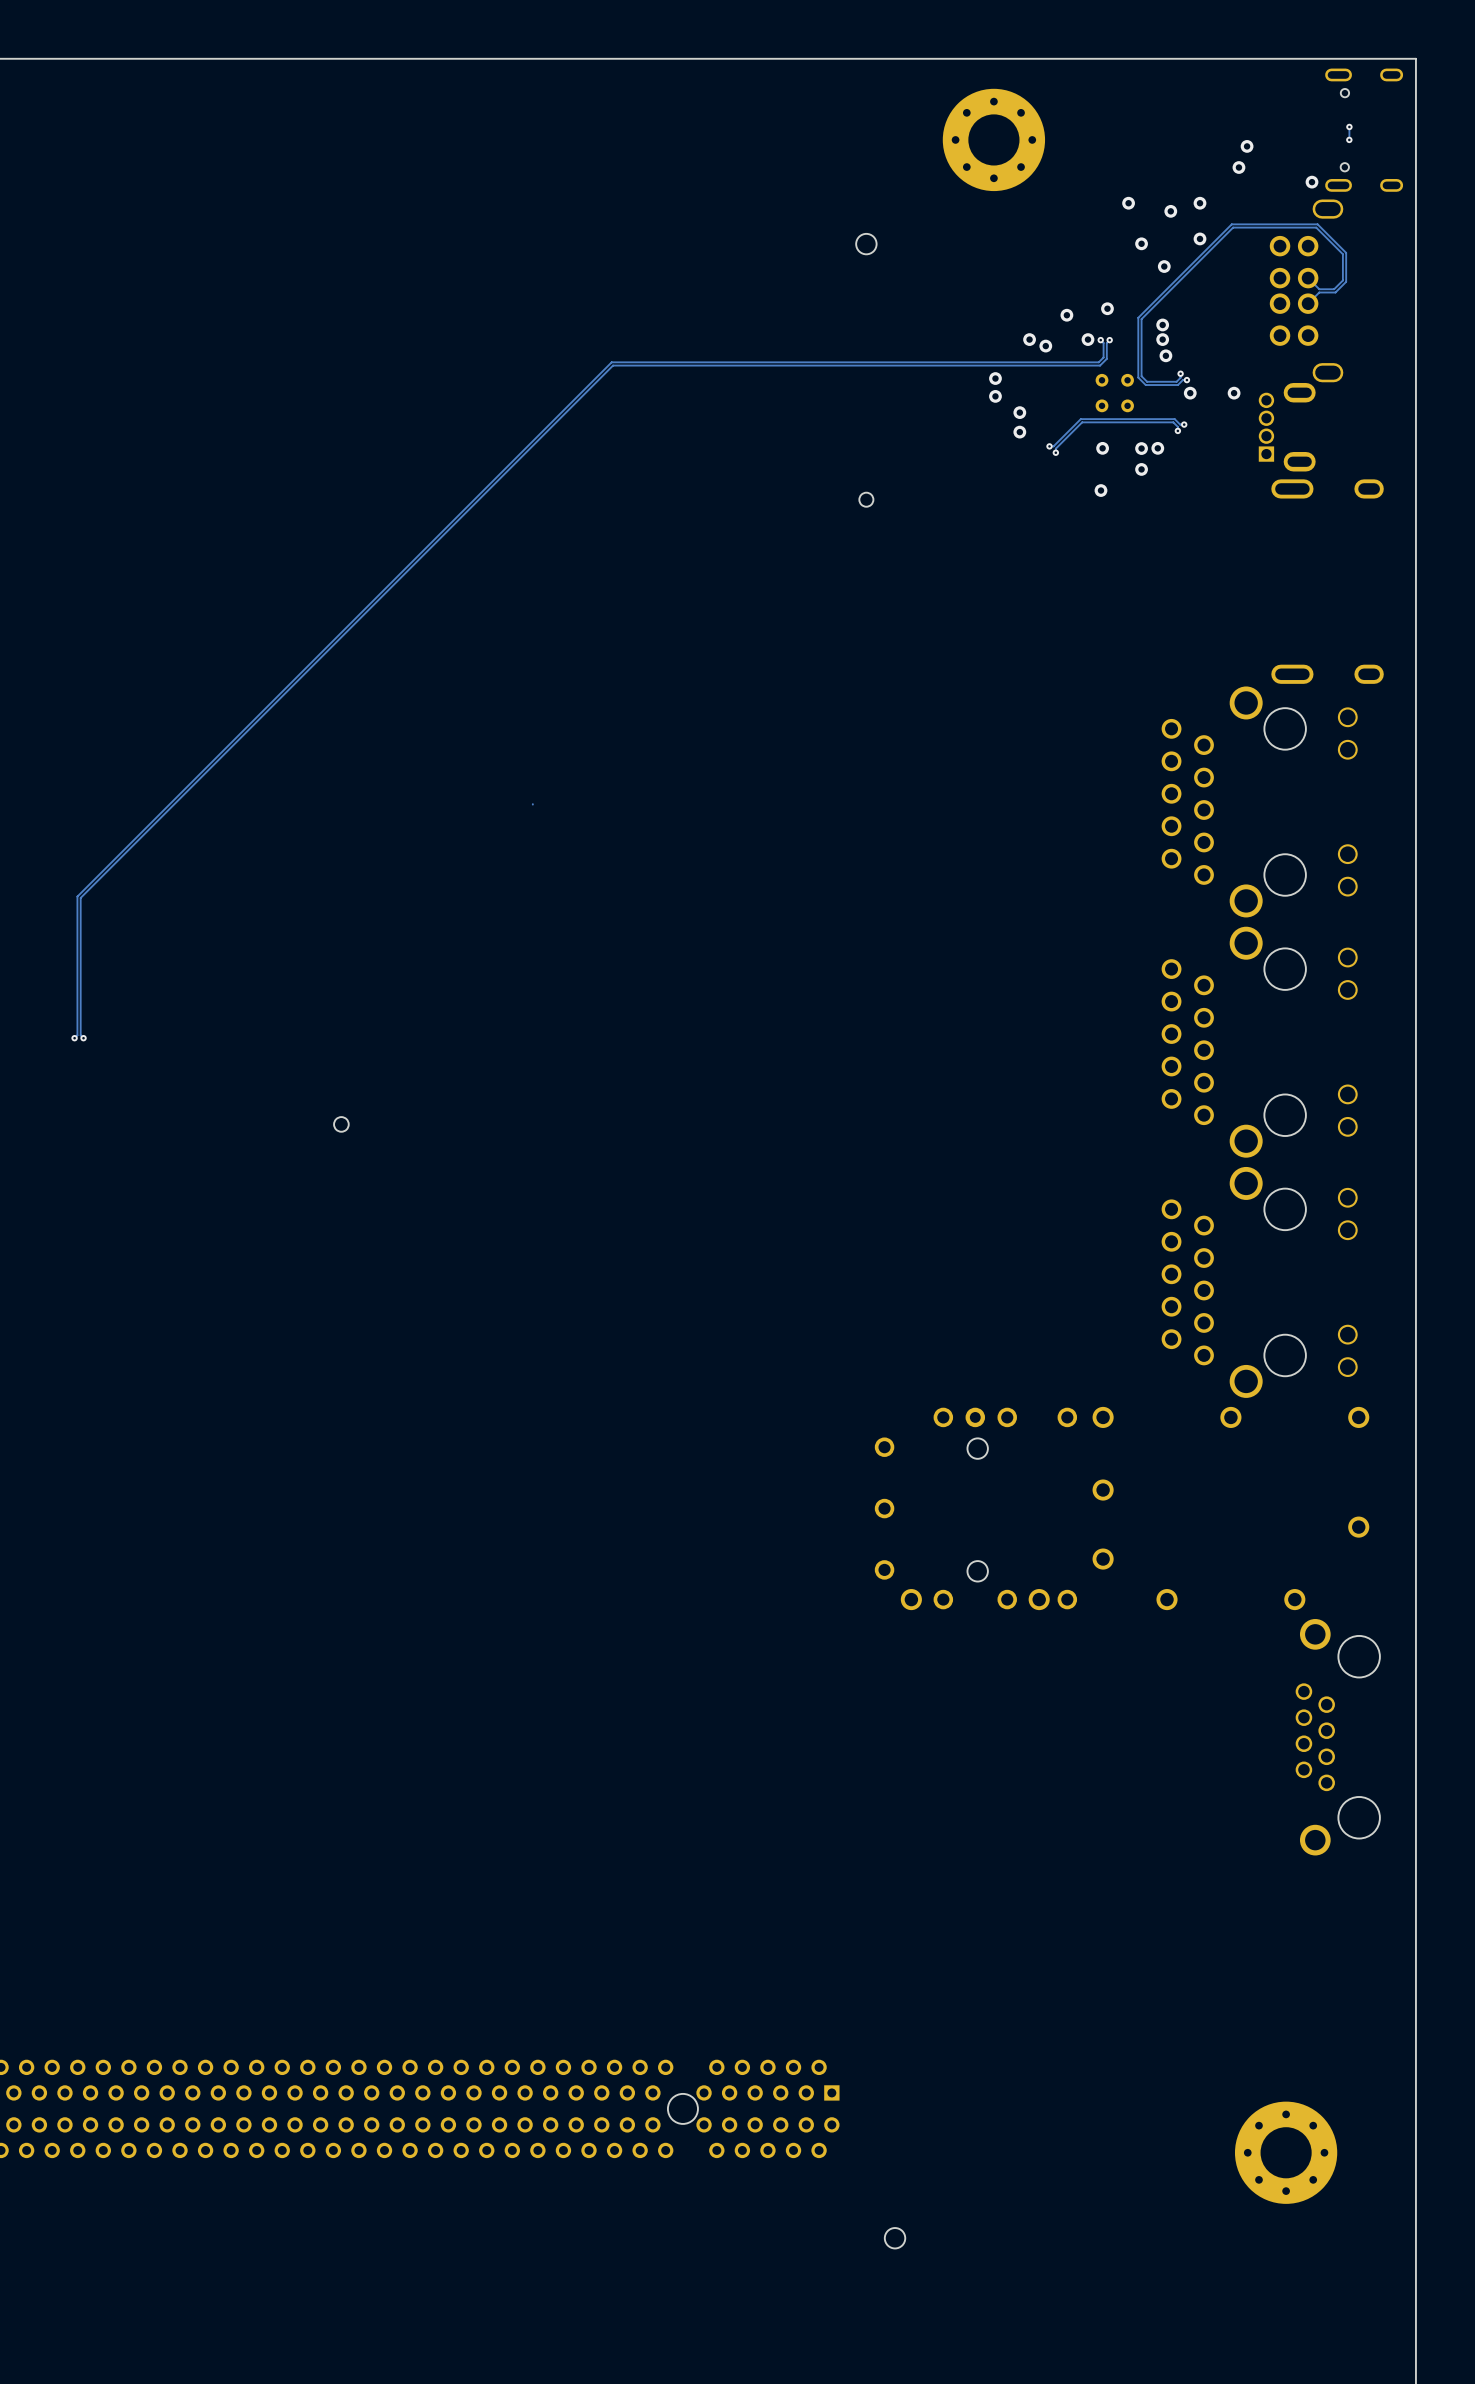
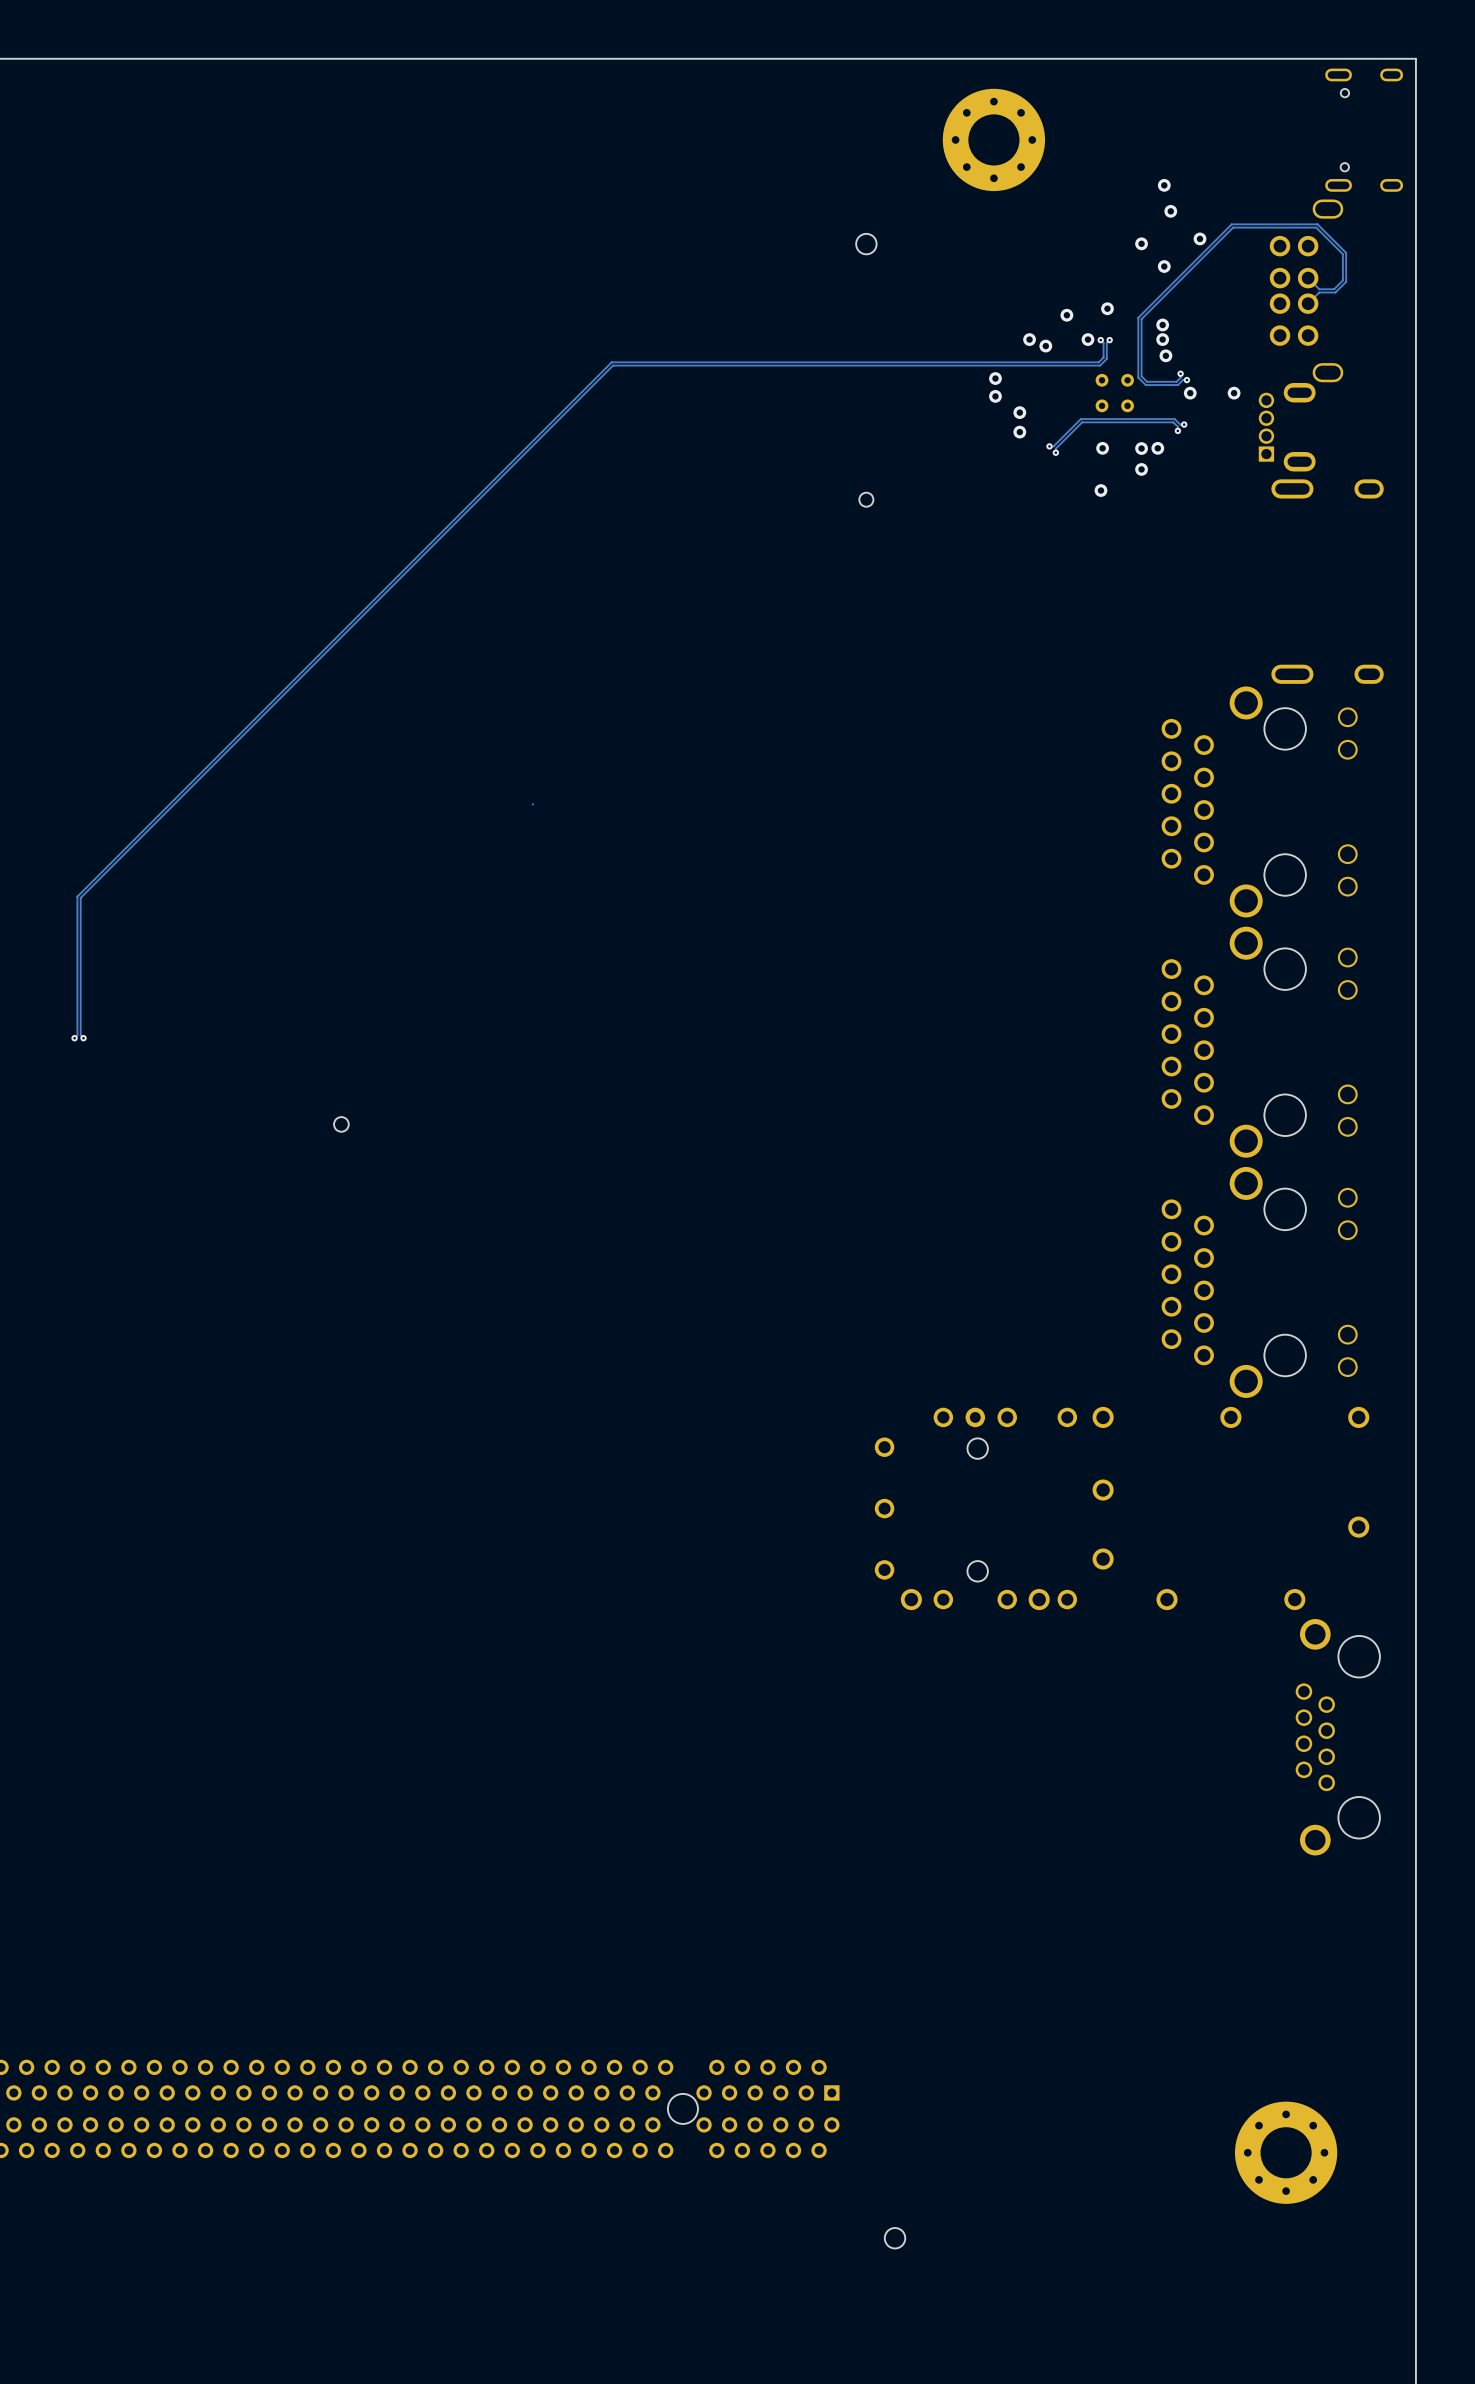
track: (1349, 126) (1349, 139) -> none
via: (1349, 126) -> none
via: (1349, 139) -> none
via: (1247, 146) -> none
via: (1238, 167) -> none
via: (1312, 182) -> none
via: none -> (1164, 185)
via: (1128, 203) -> none
via: (1200, 203) -> none

